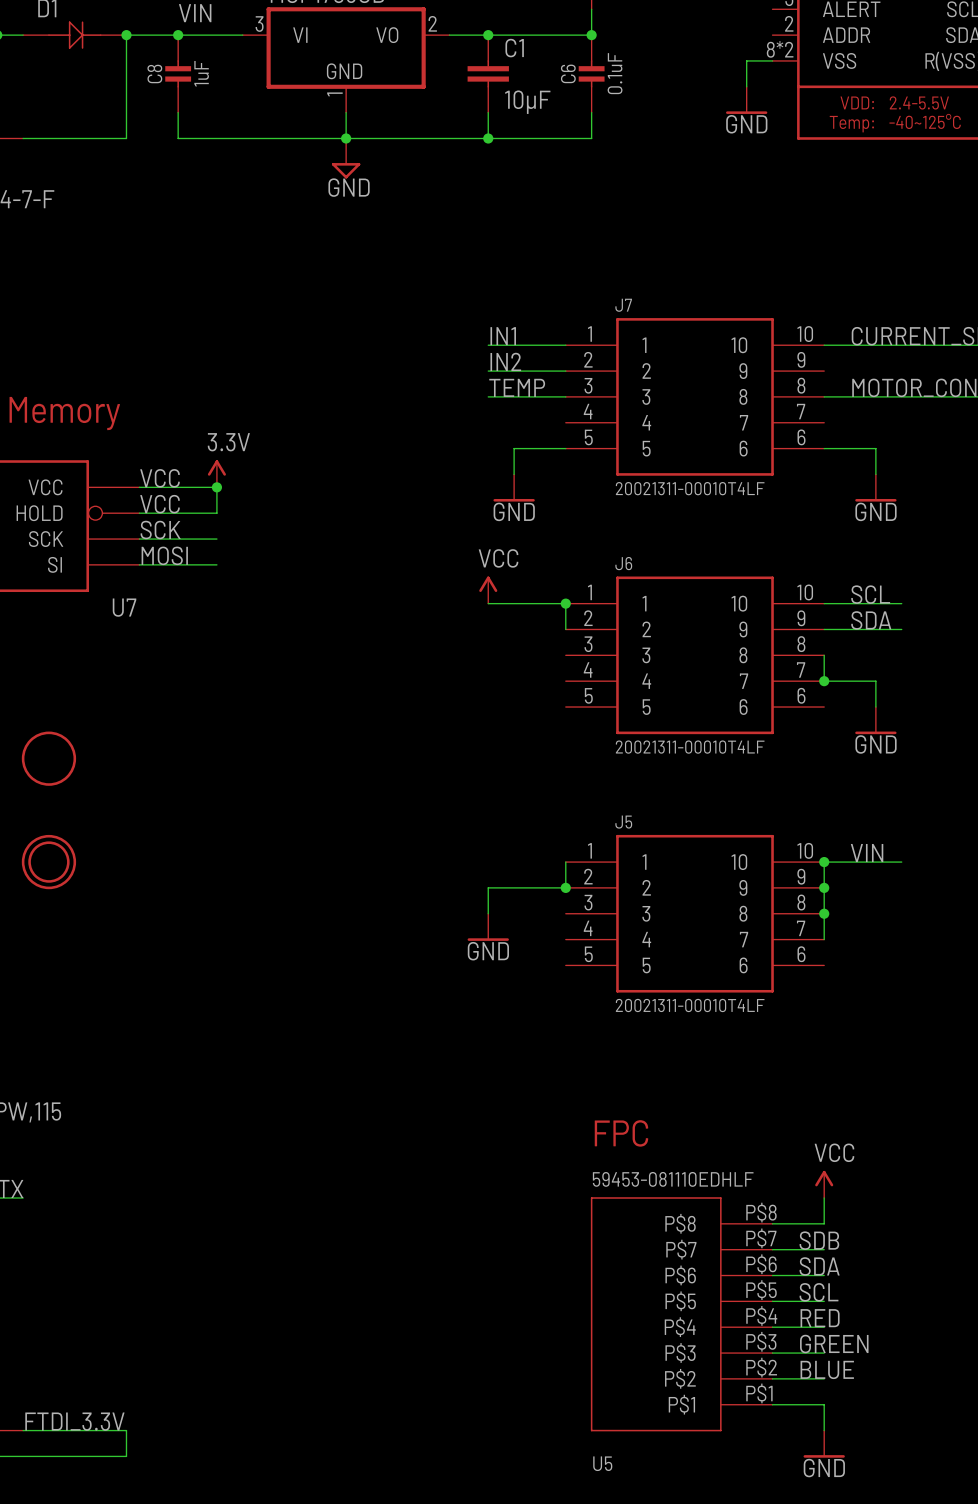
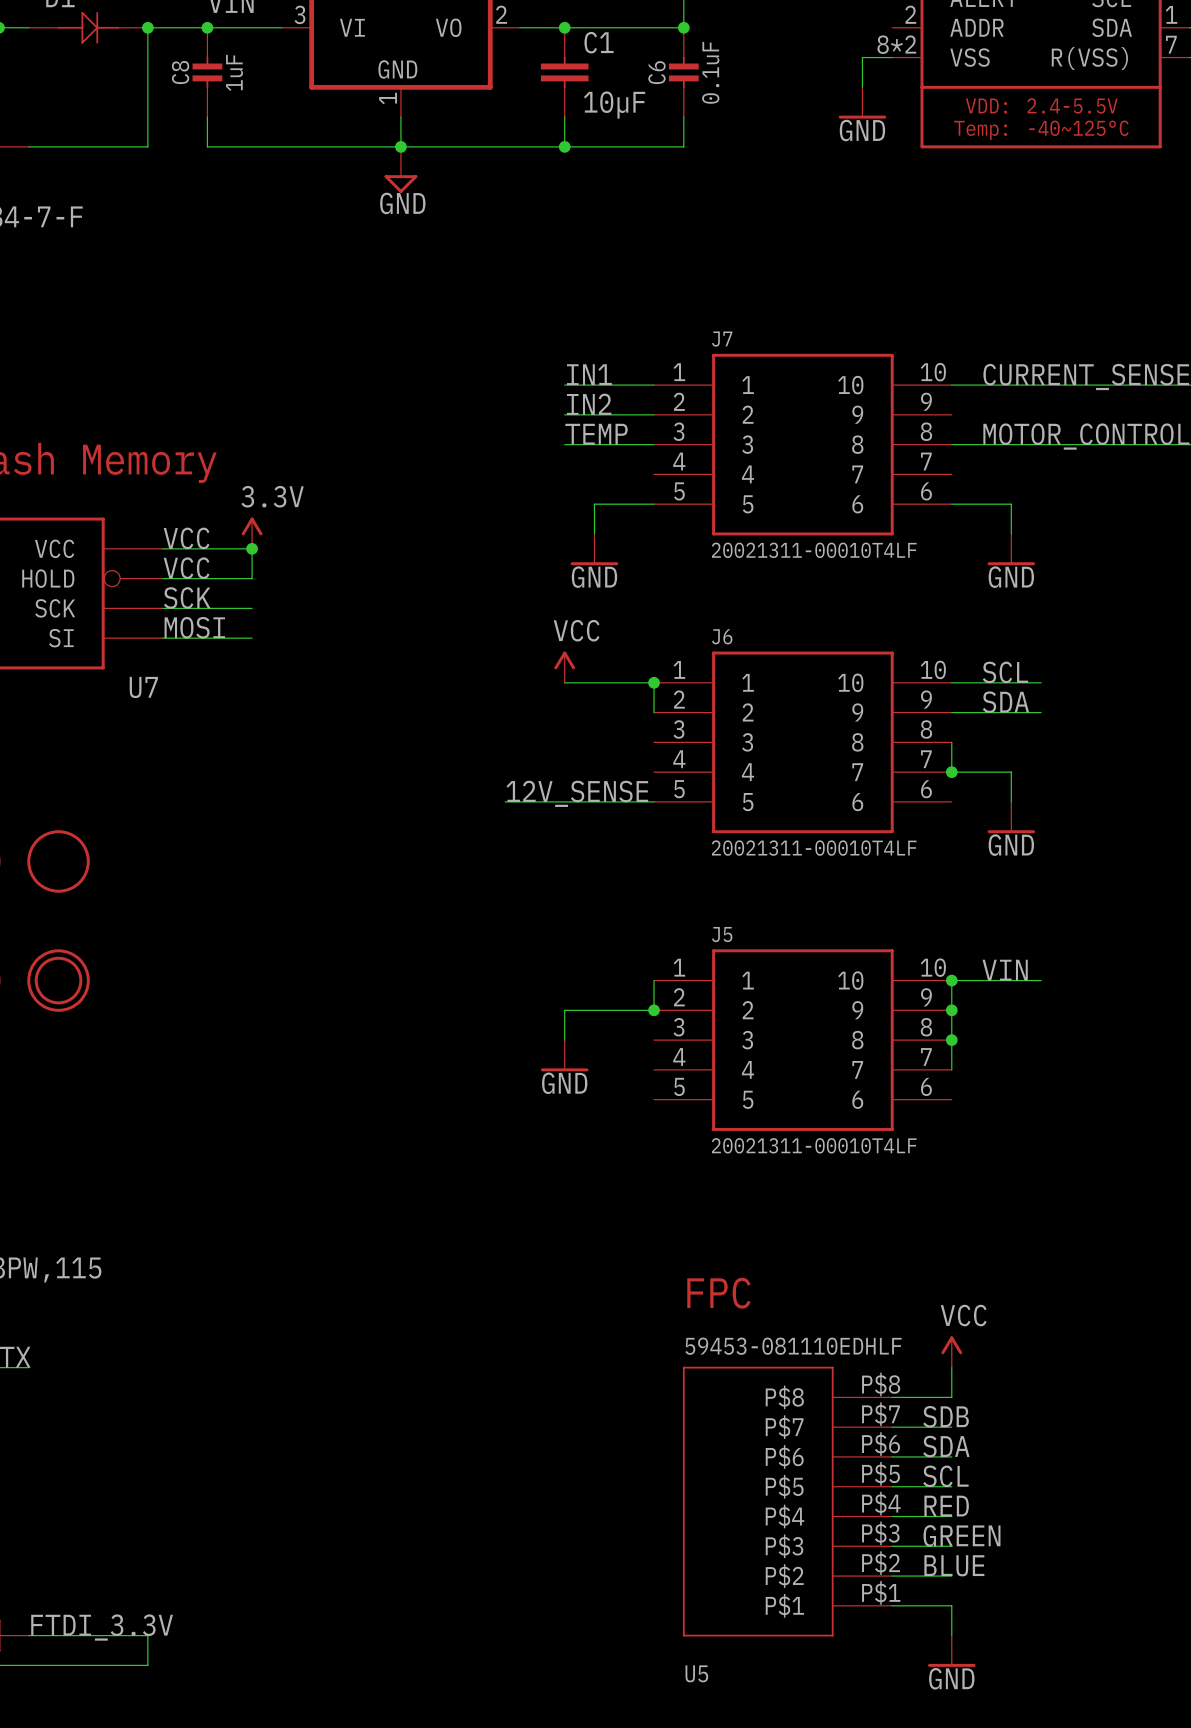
label: none -> 12V_SENSE (577, 793)
wire: none -> (505, 801) (654, 801)

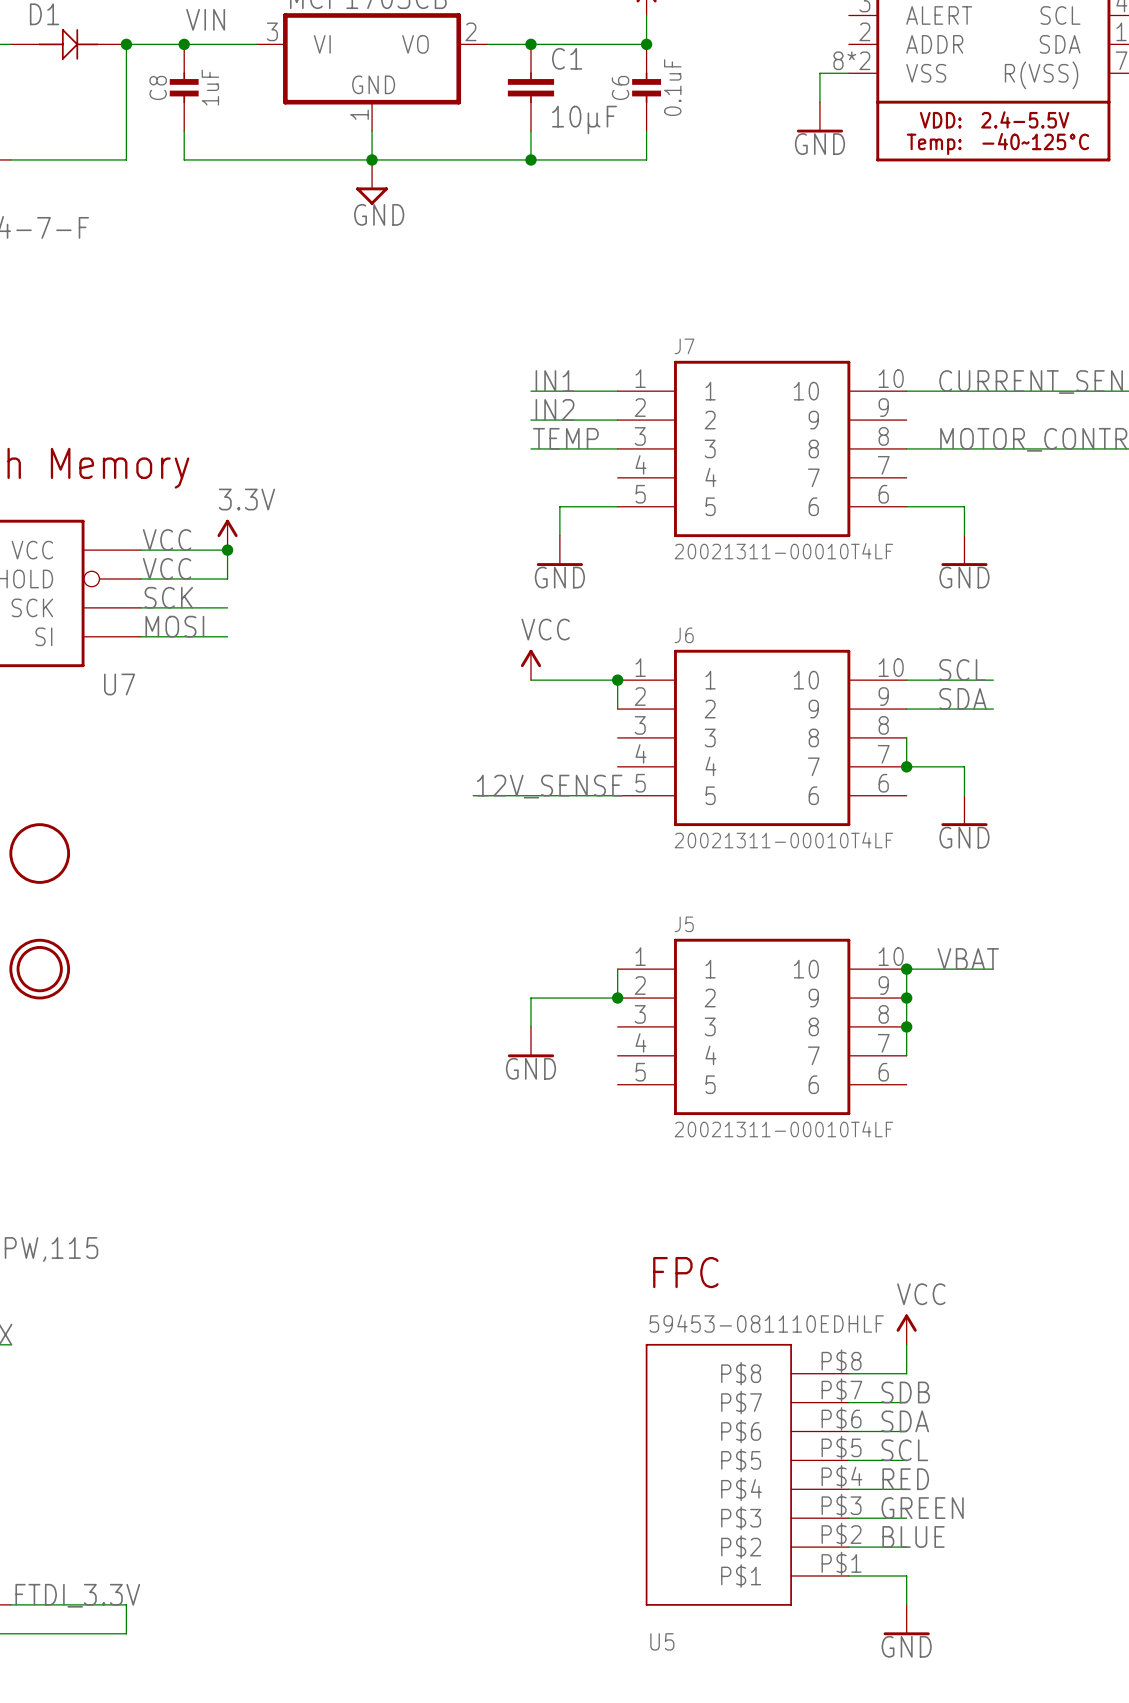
label: VIN (1005, 970) -> VBAT (968, 959)

